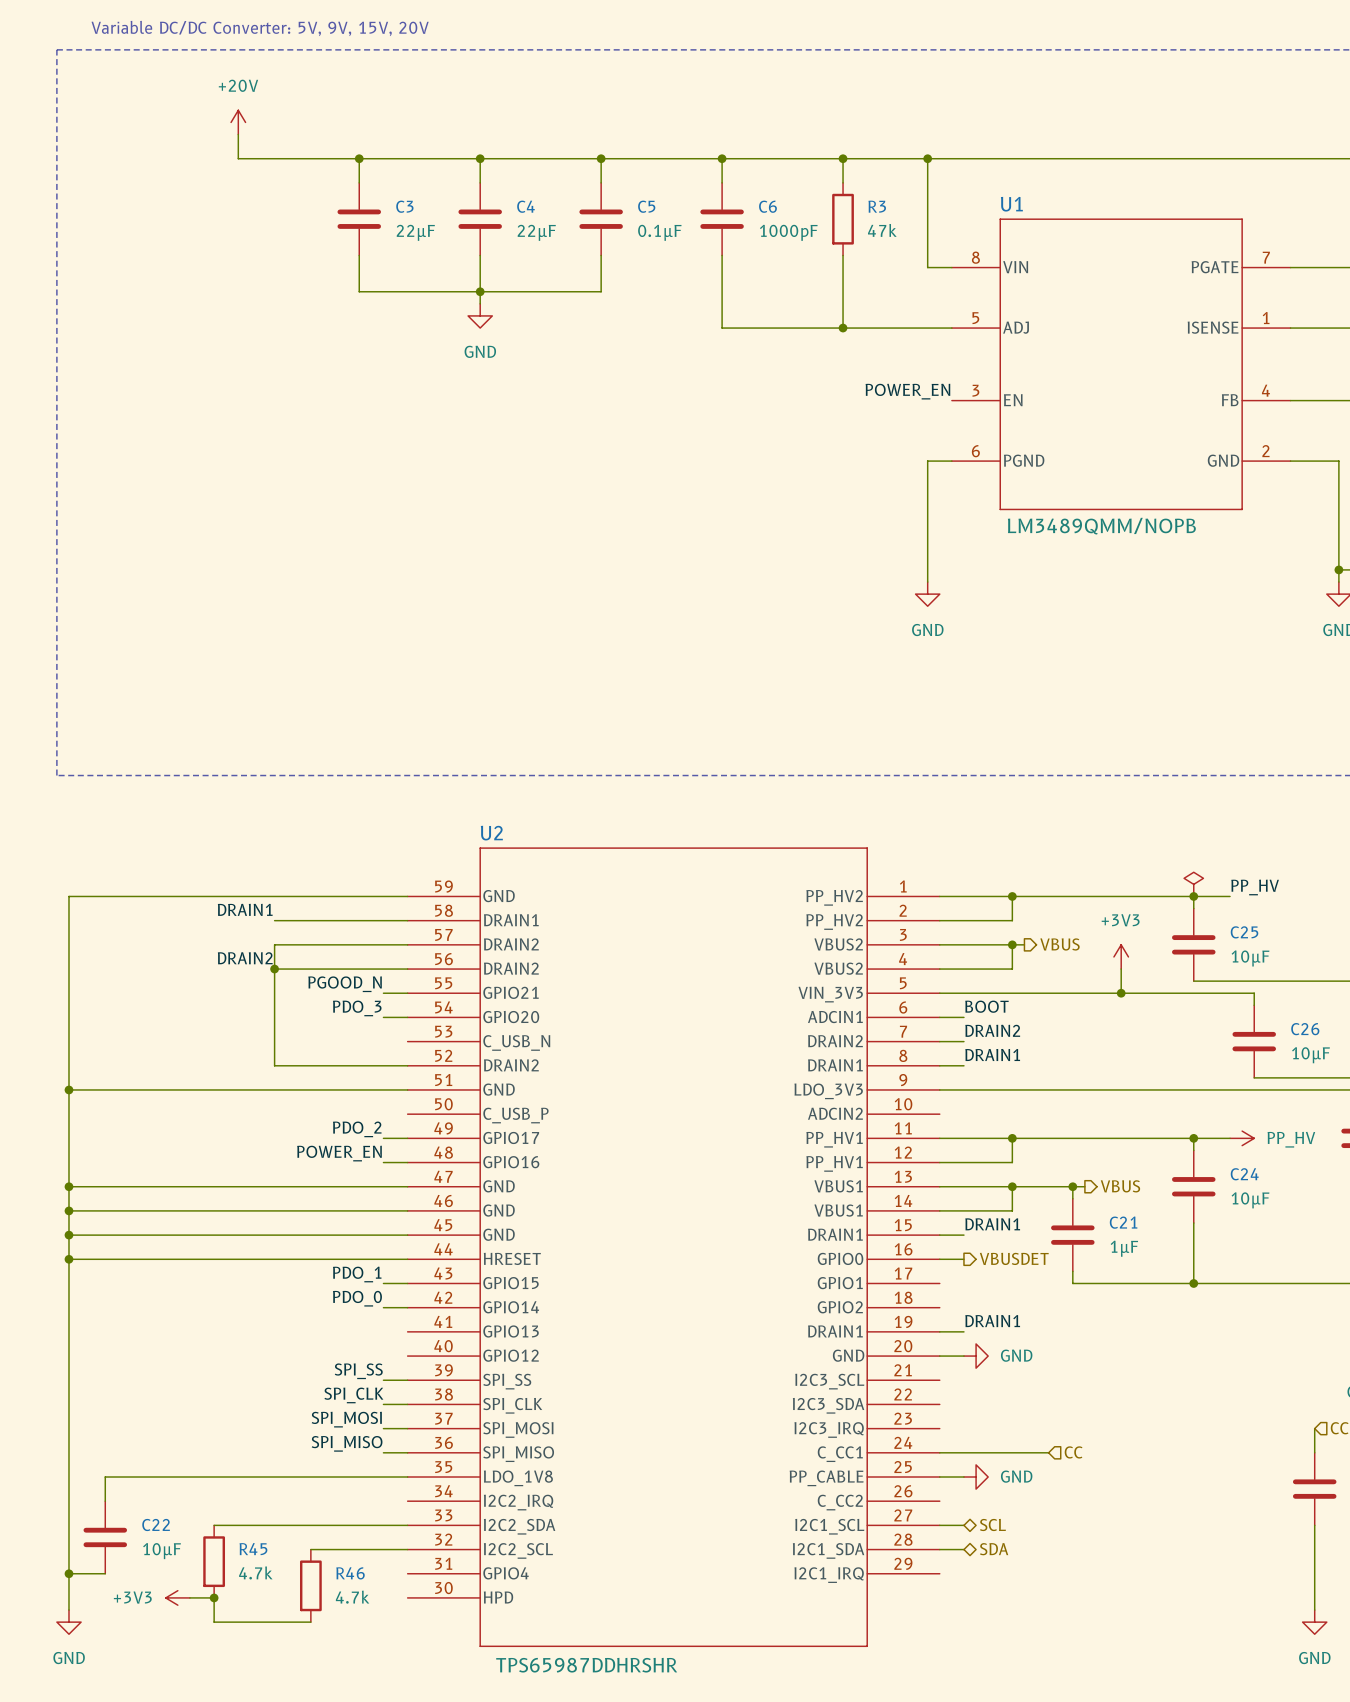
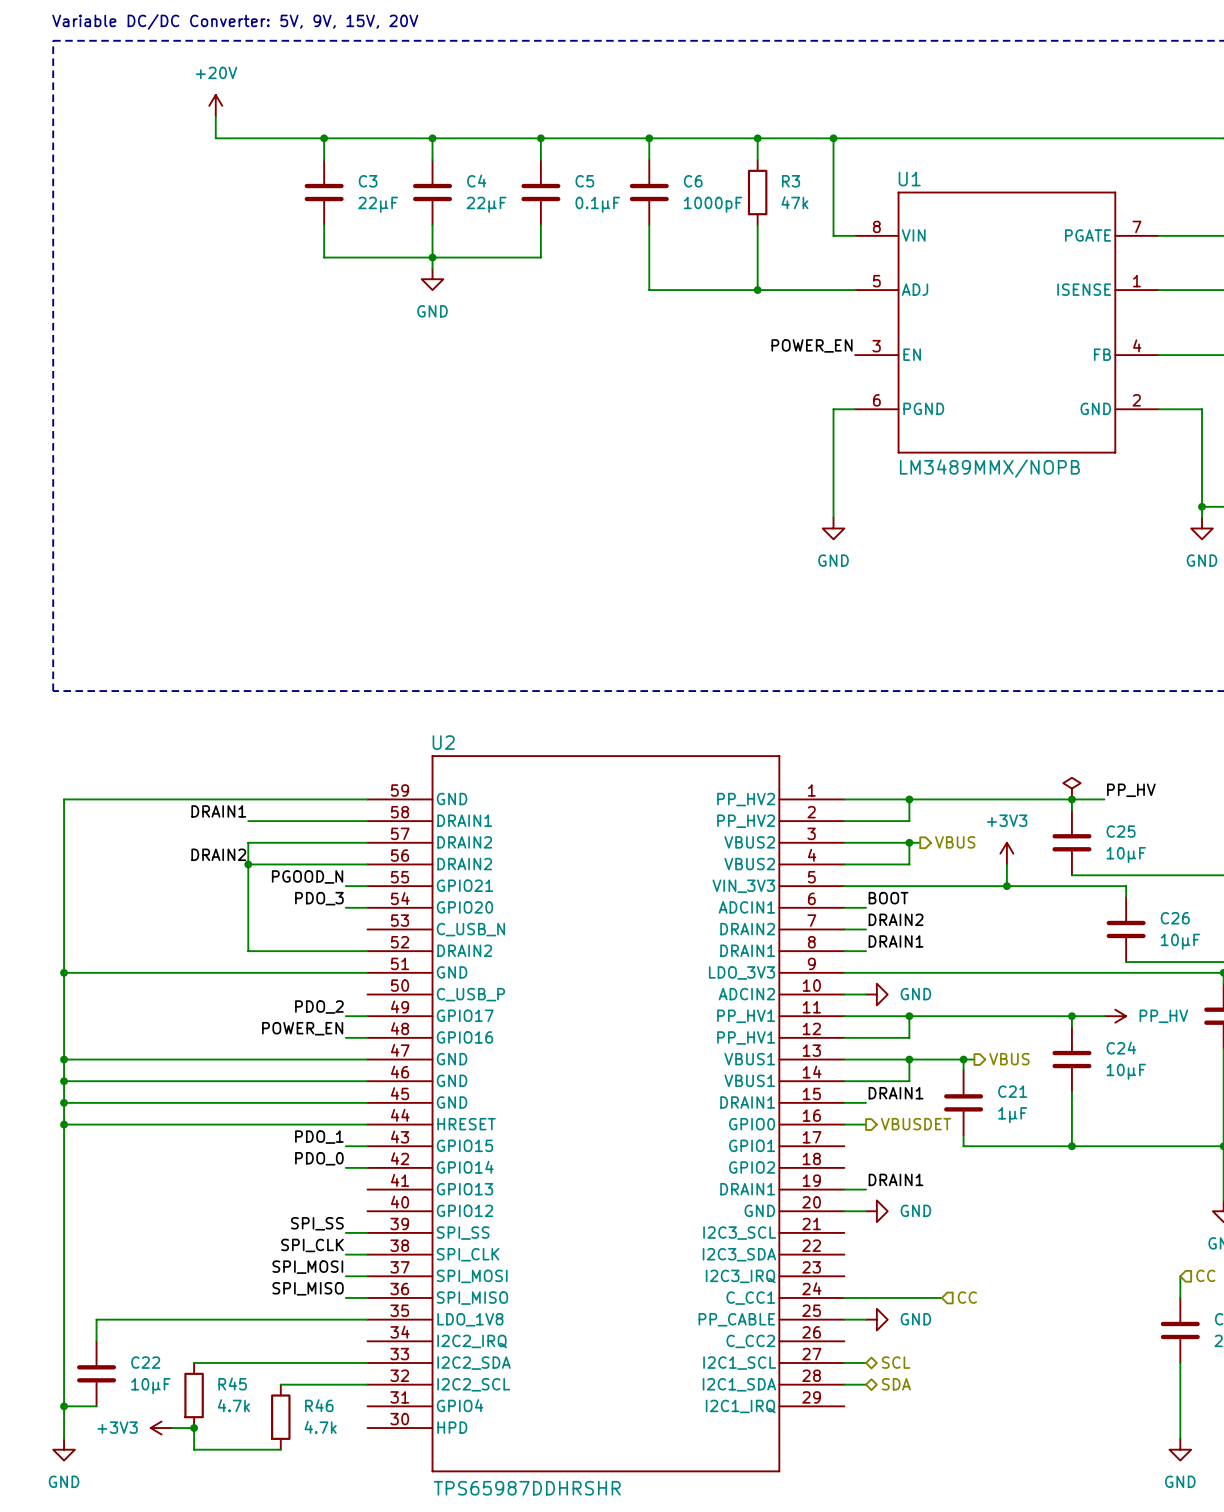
U1 value: LM3489QMM/NOPB (1101, 526) -> LM3489MMX/NOPB (989, 468)
wire: none -> (844, 994) (866, 994)
power symbol: none -> GND (876, 994)

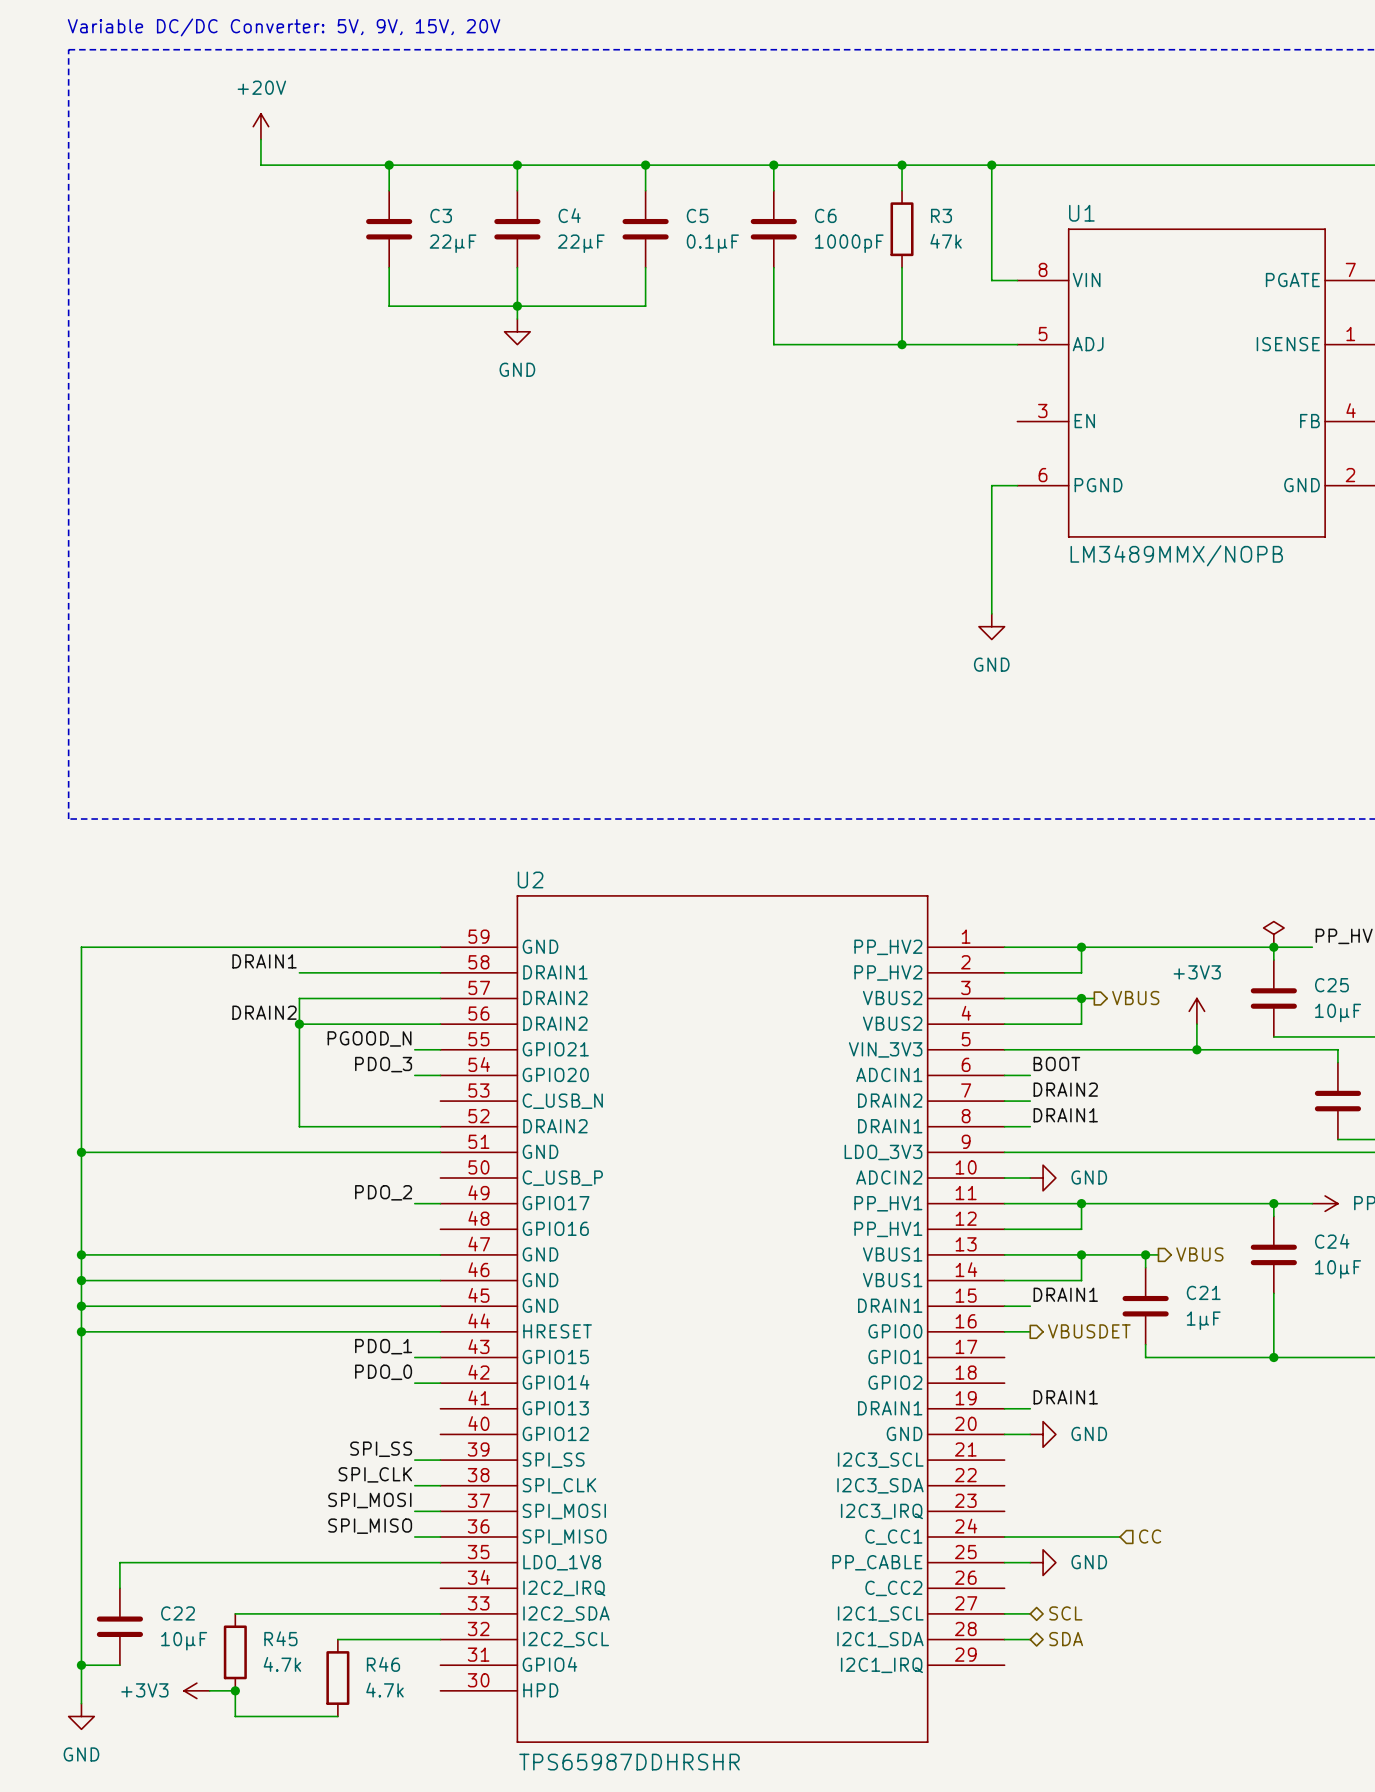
label: POWER_EN (812, 345) -> none
label: POWER_EN (302, 1028) -> none
wire: (345, 1037) (367, 1037) -> none

